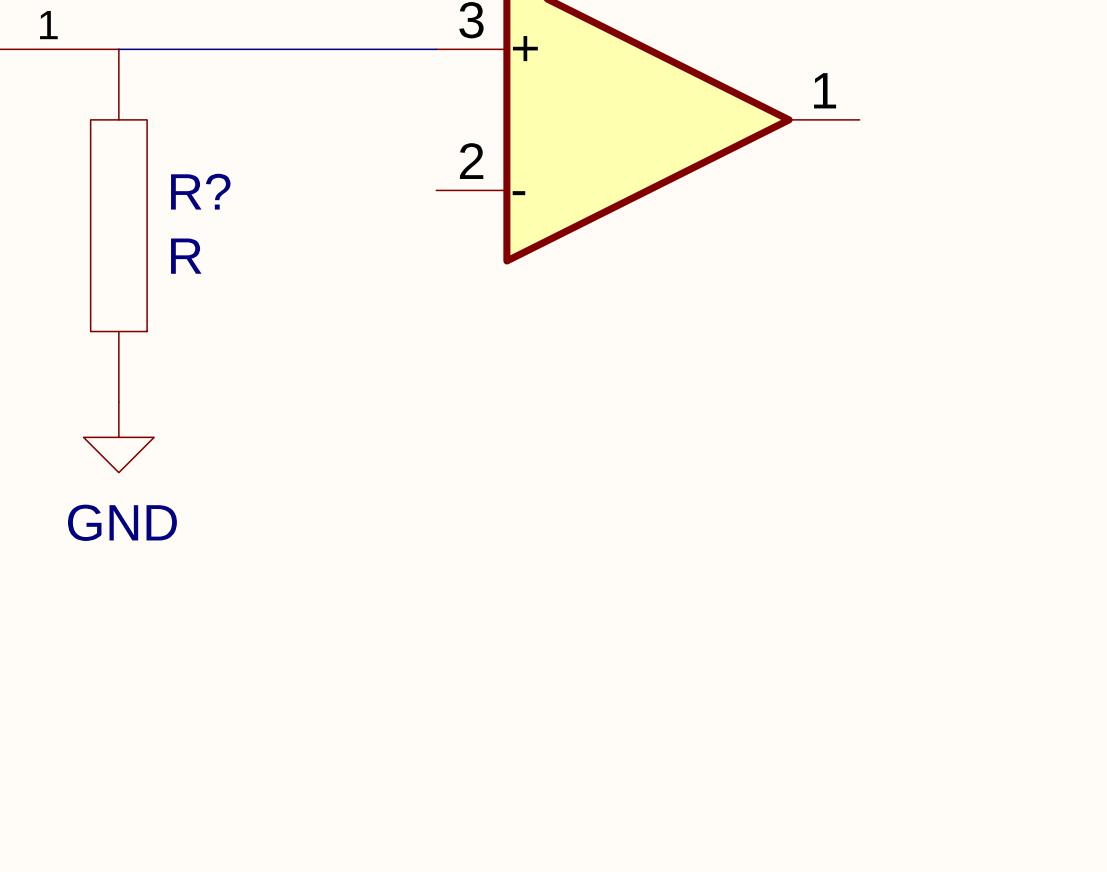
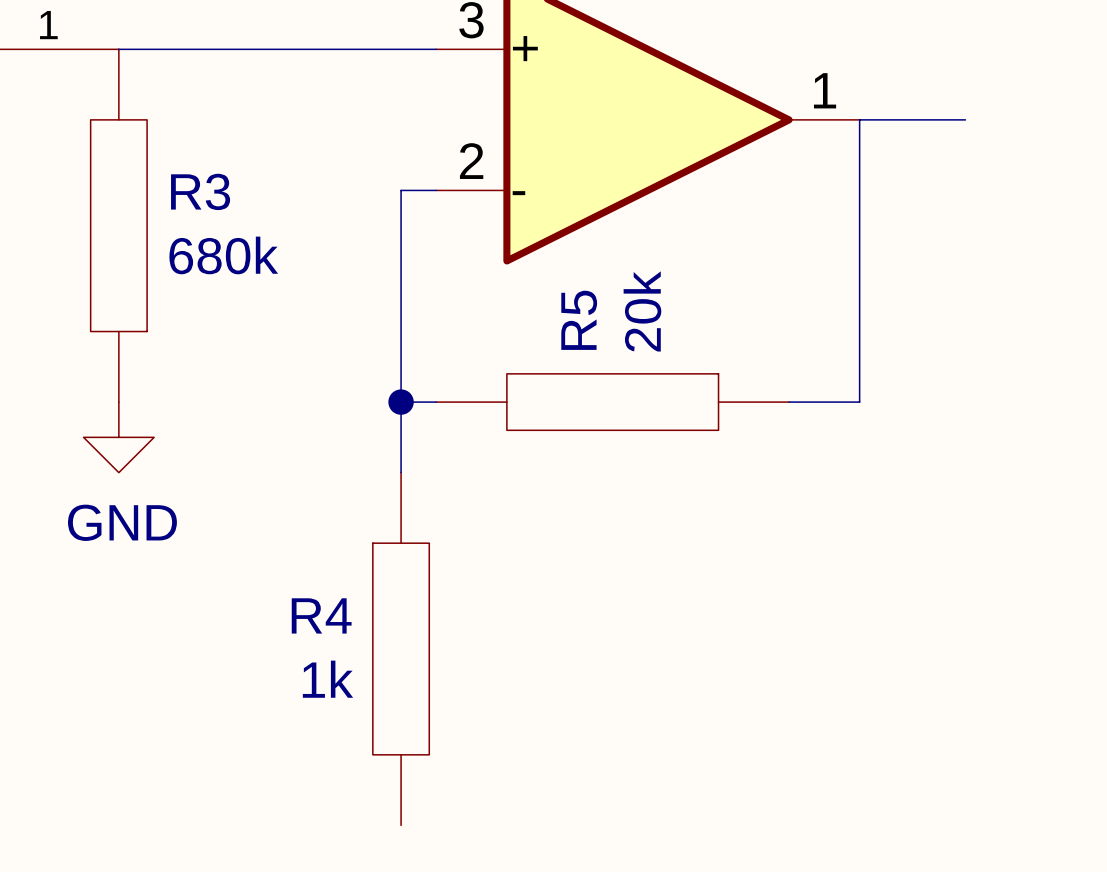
bus: none -> (965, 119) (859, 119) (859, 402) (789, 402)
bus: none -> (436, 190) (401, 190) (401, 472)
R? name: R? (200, 191) -> R3 (200, 191)
R? value: R (186, 256) -> 680k (223, 255)
bus: none -> (401, 402) (436, 402)
junction: none -> (401, 402)
R5: none -> 20k (612, 402)
1k: none -> R4 (401, 649)

